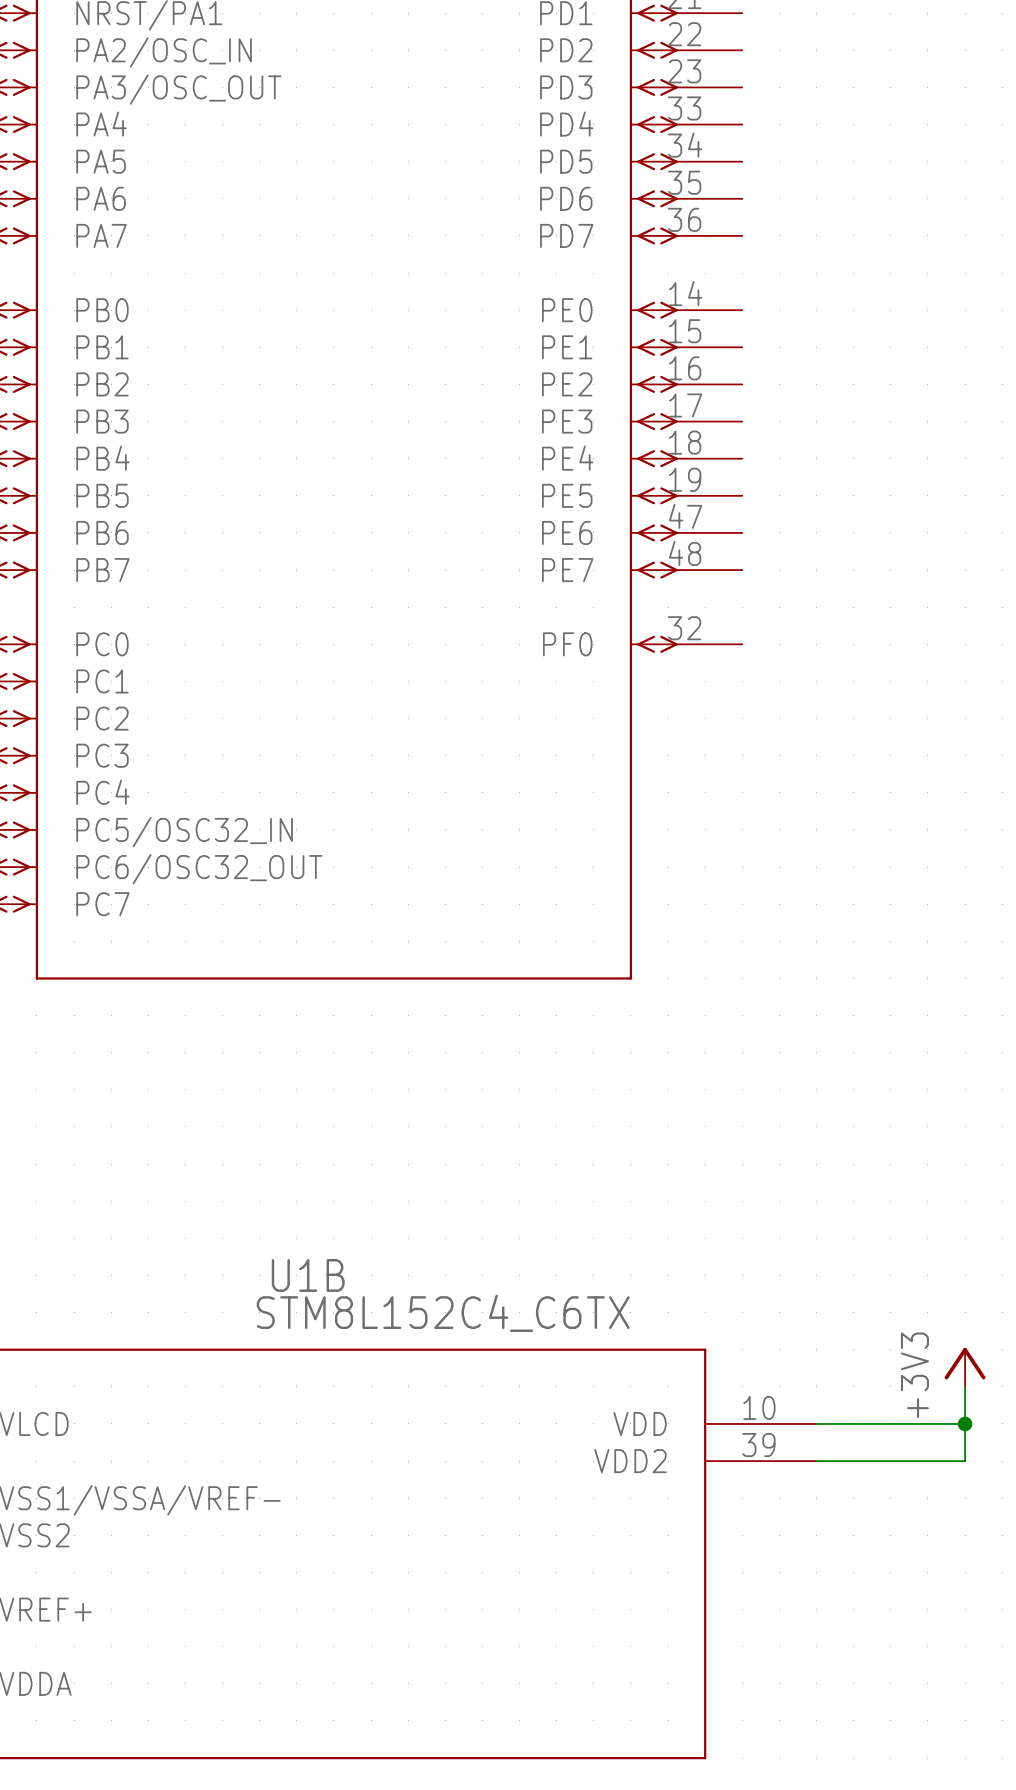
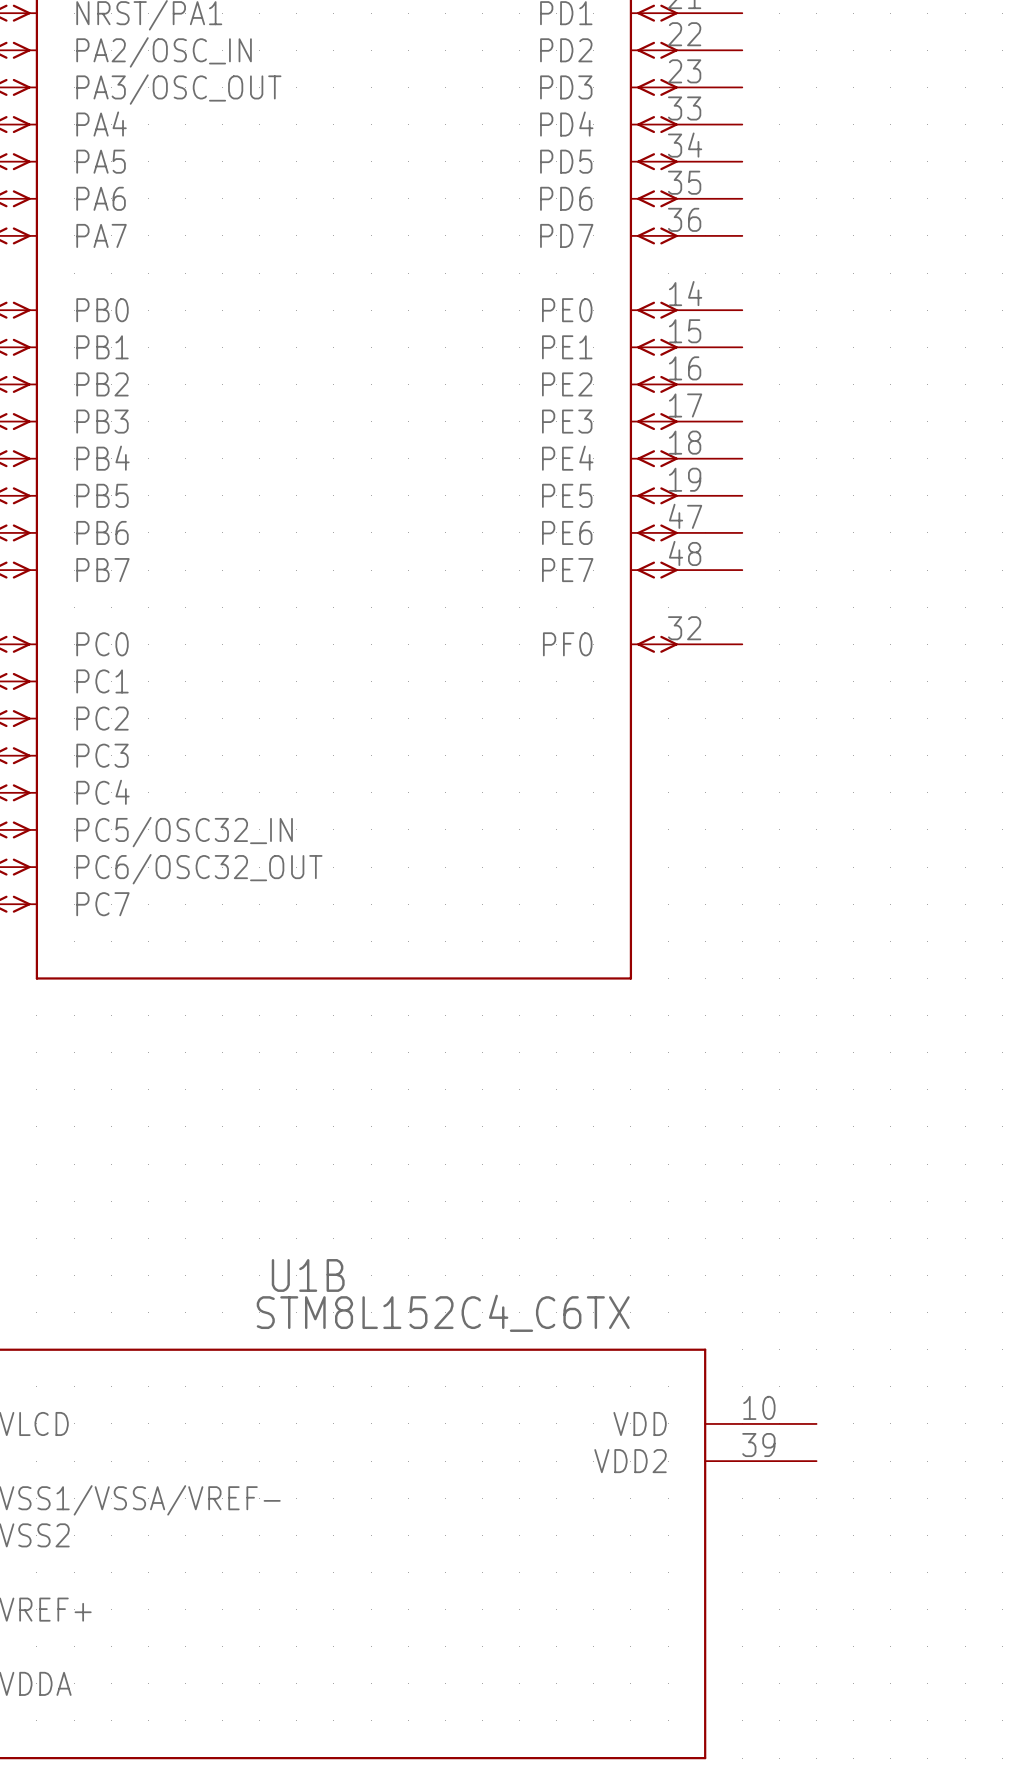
power symbol: +3V3 (965, 1367) -> none
wire: (965, 1386) (965, 1461) (816, 1461) -> none
wire: (816, 1423) (965, 1423) -> none
junction: (965, 1423) -> none

